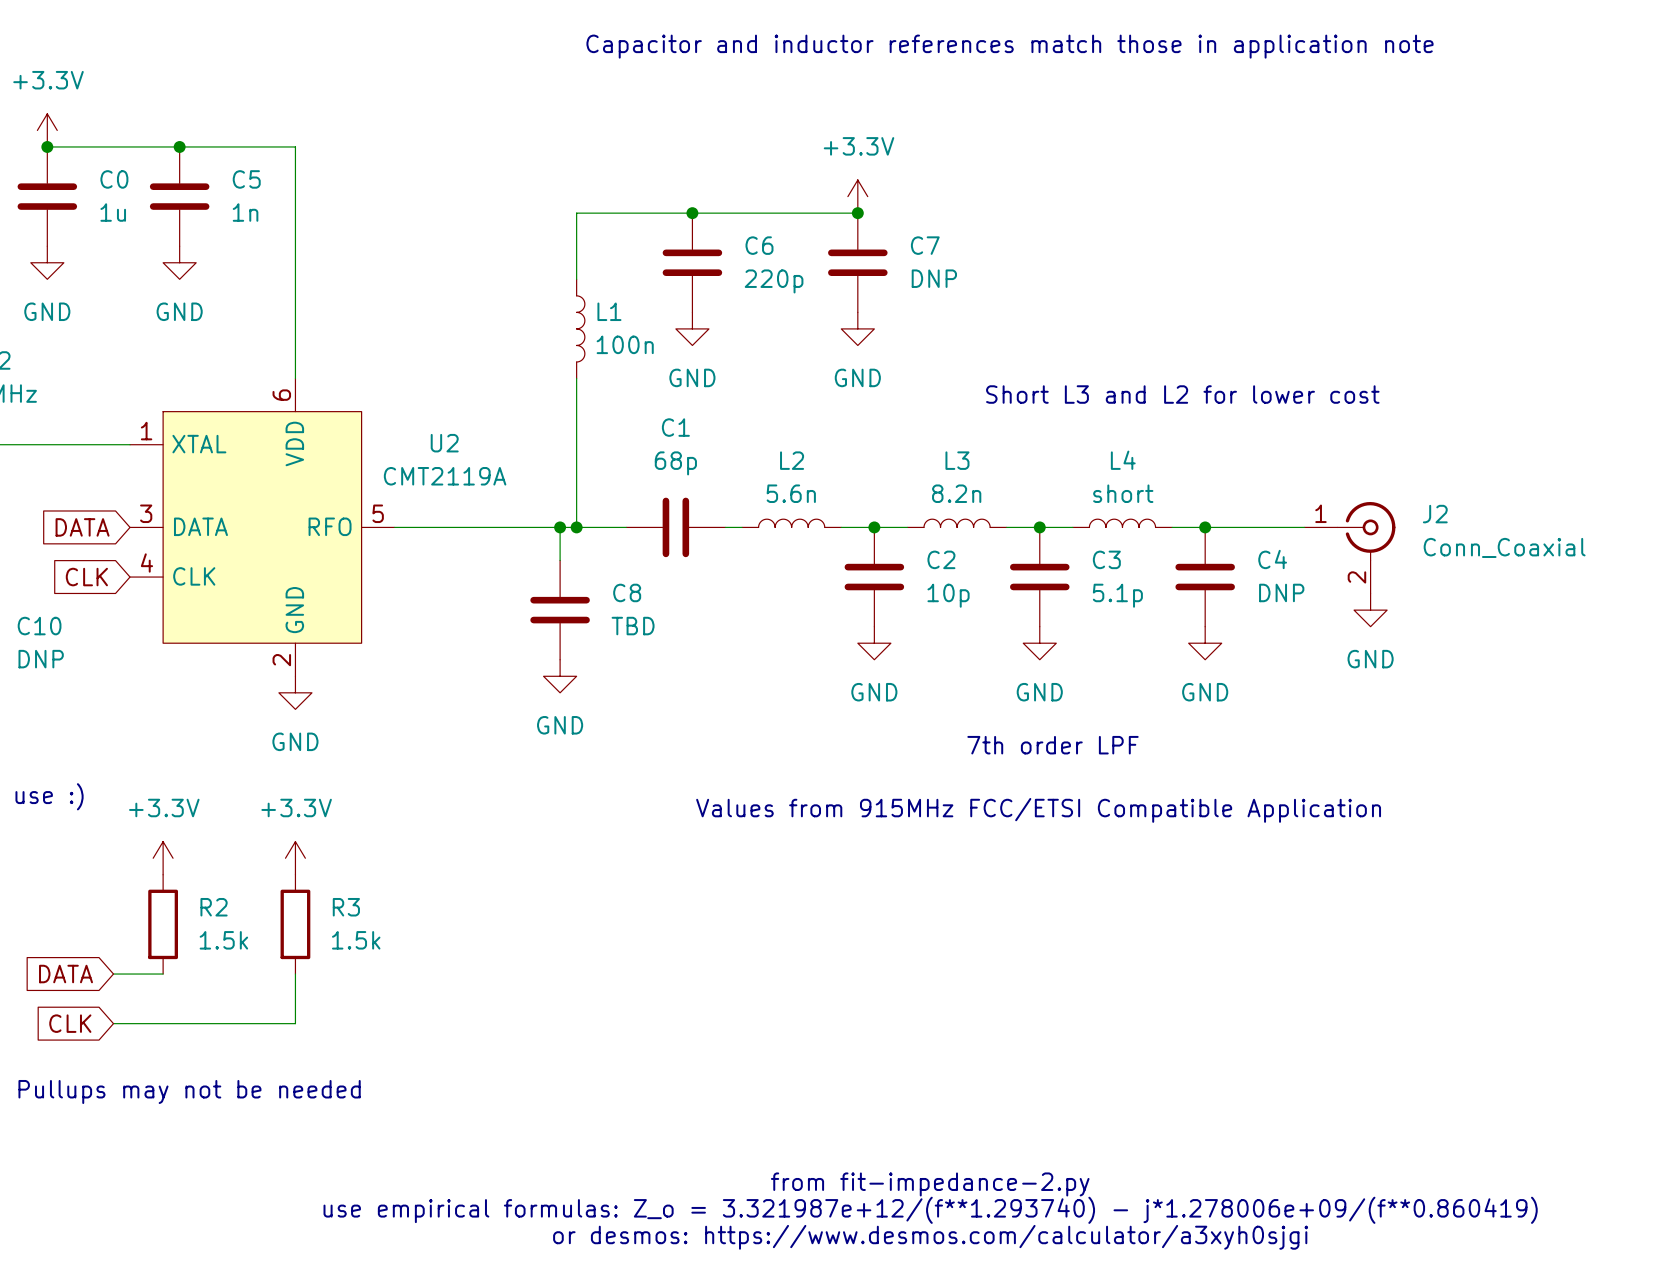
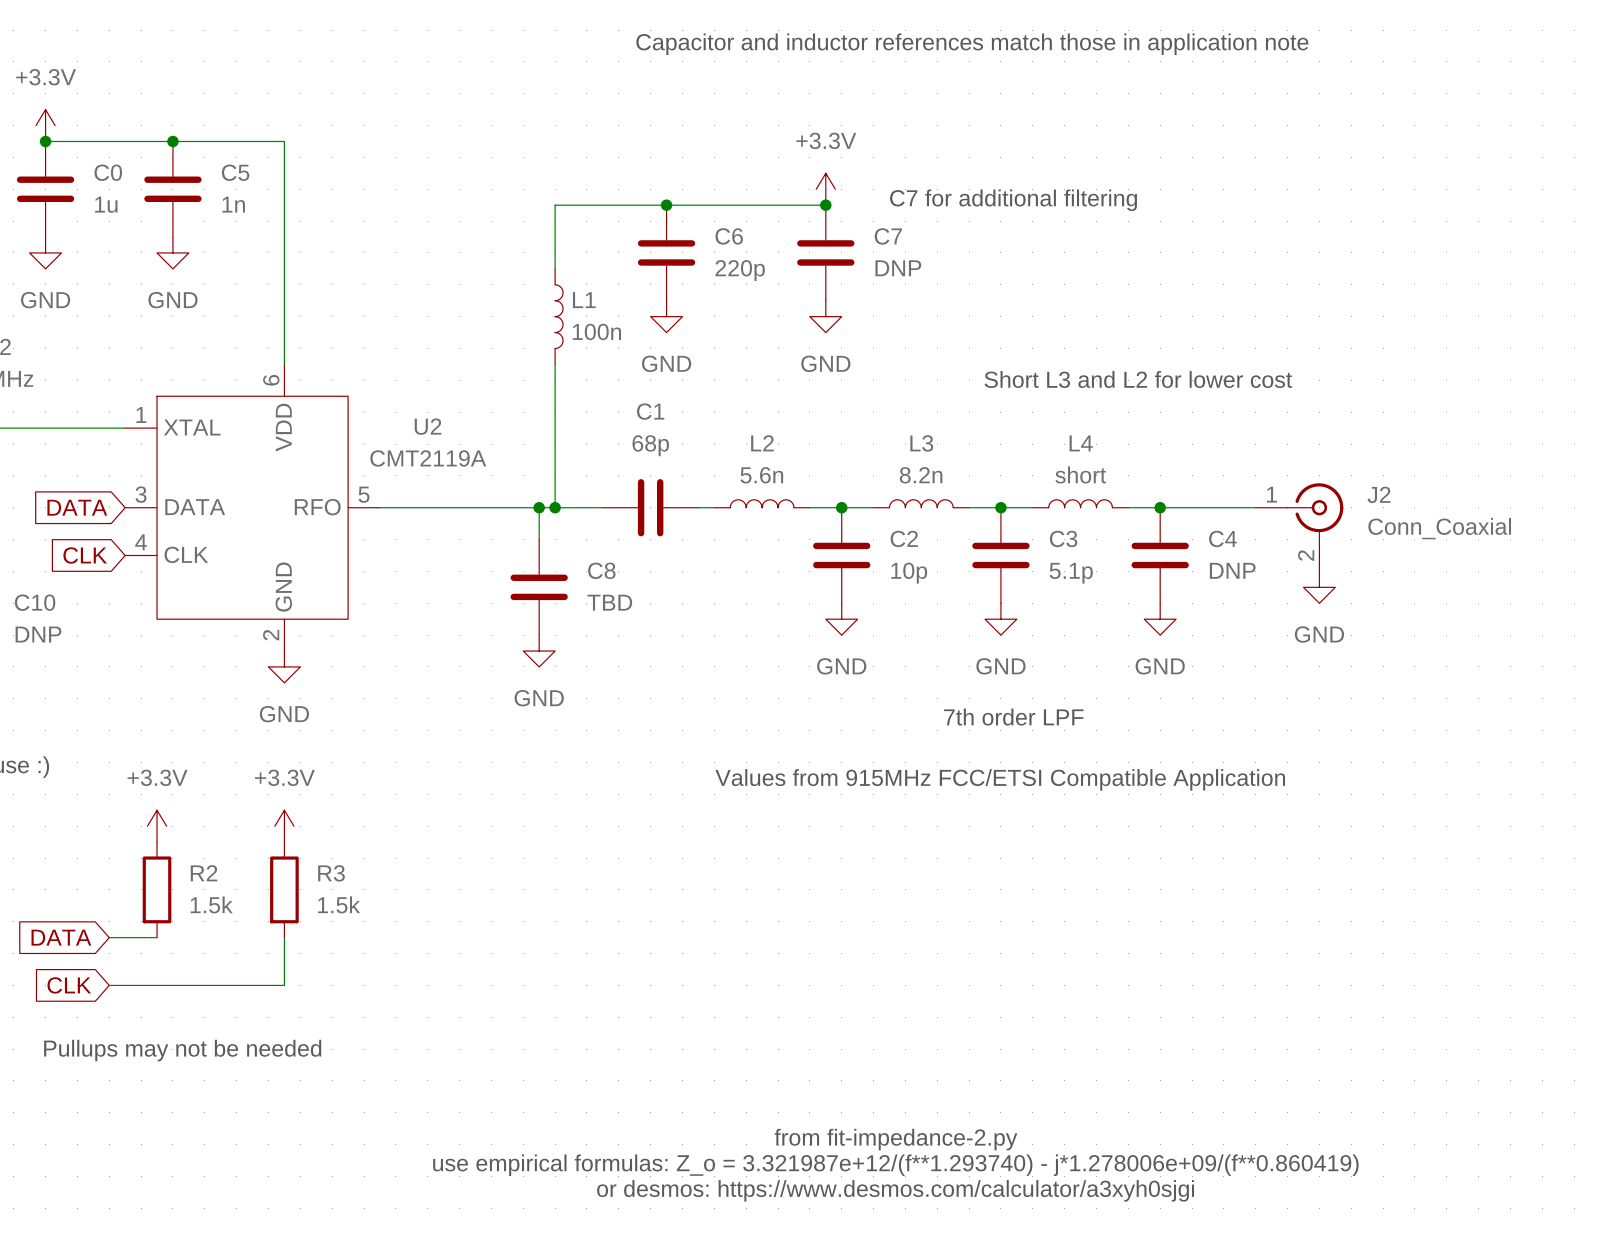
text: none -> C7 for additional filtering (1013, 200)

